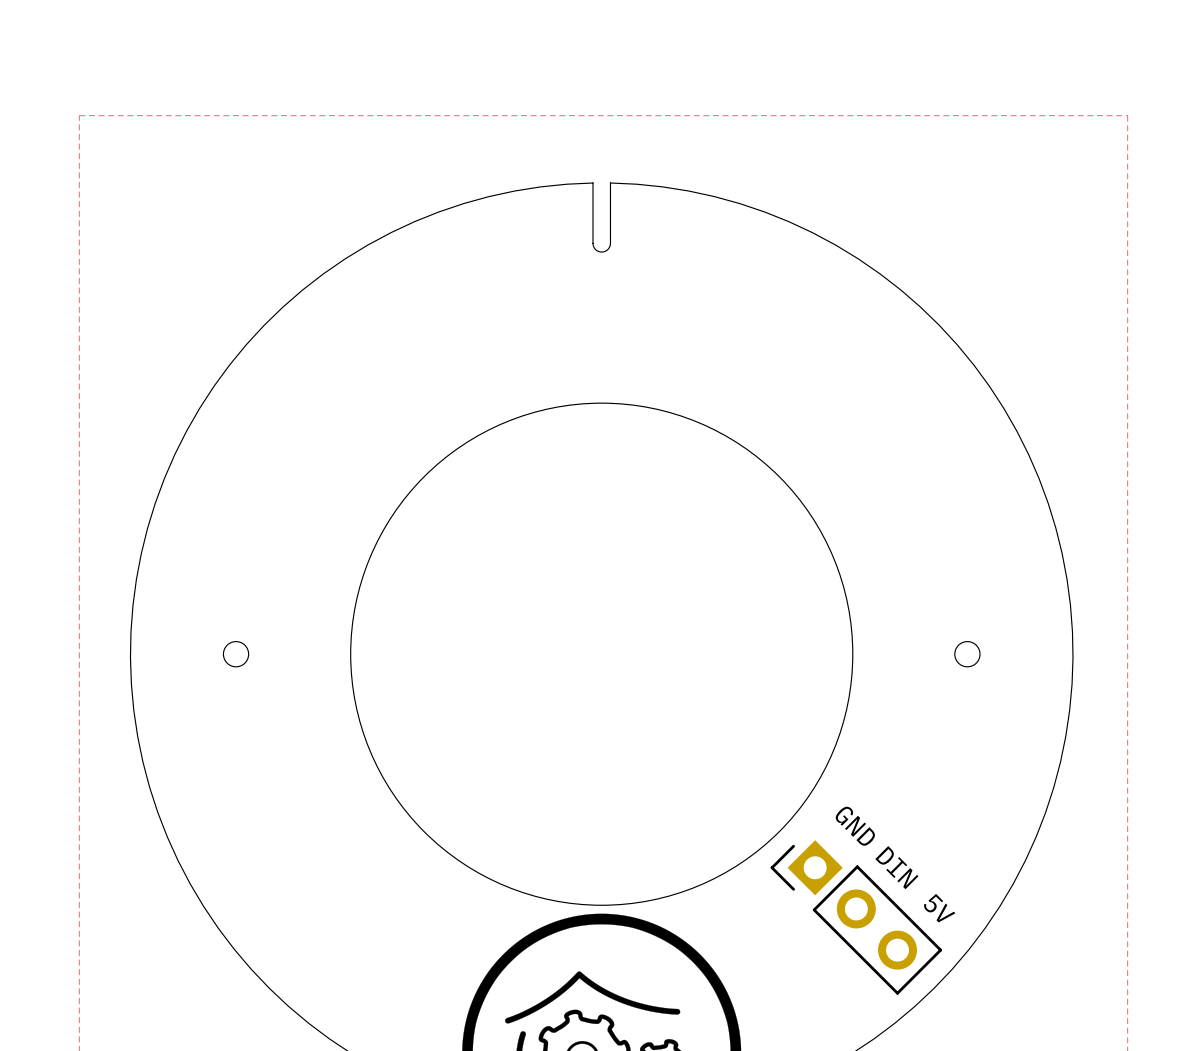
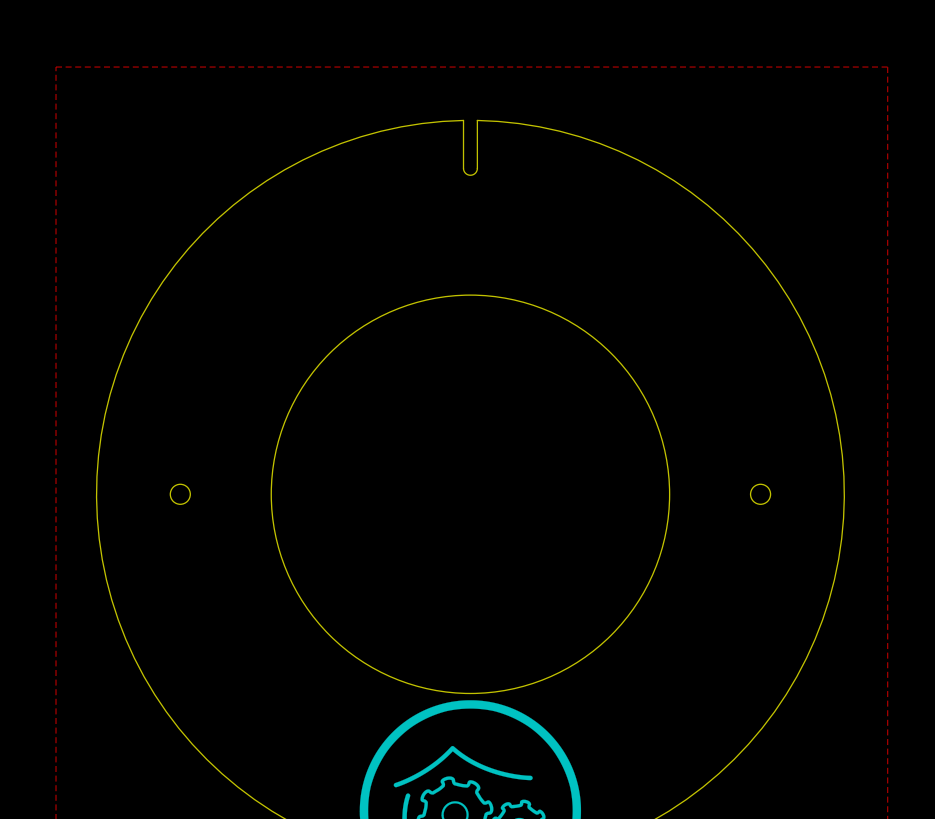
text: GND (855, 826) -> none
text: DIN (896, 867) -> none
text: 5V (939, 908) -> none
part: (856, 917) -> none

